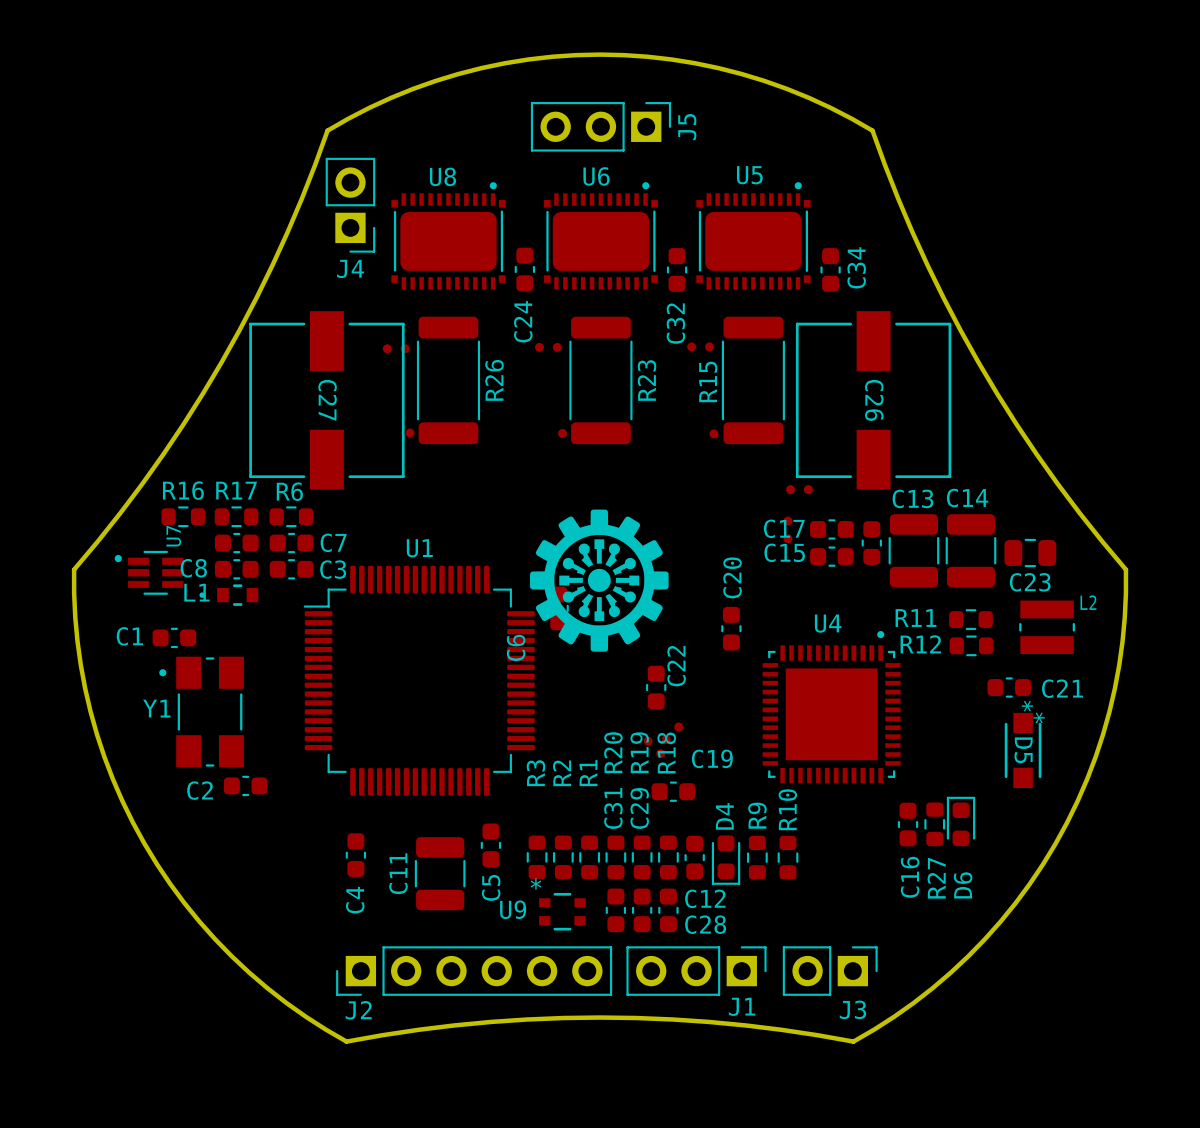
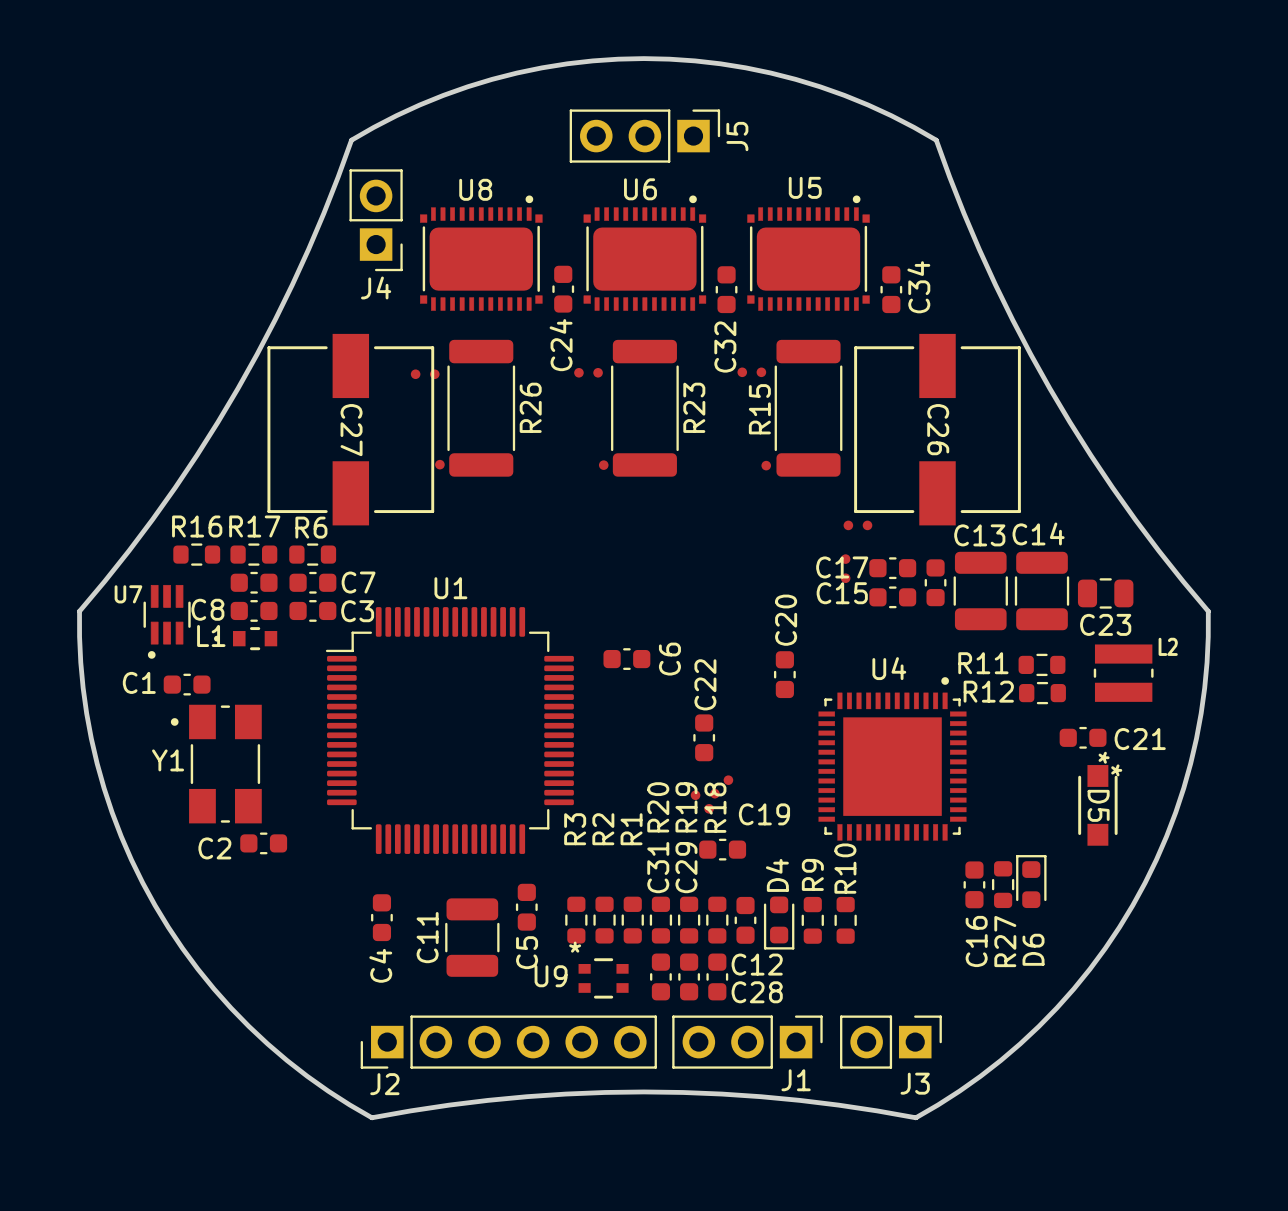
drawing: [530, 509, 669, 652] -> none
U7 rotation: 0° (149, 572) -> 90° counterclockwise (167, 621)
C6 rotation: 0° (558, 608) -> 90° clockwise (626, 659)
C6 name position: C6 (516, 647) -> C6 (669, 659)
C22 name position: C22 (676, 666) -> C22 (705, 684)

